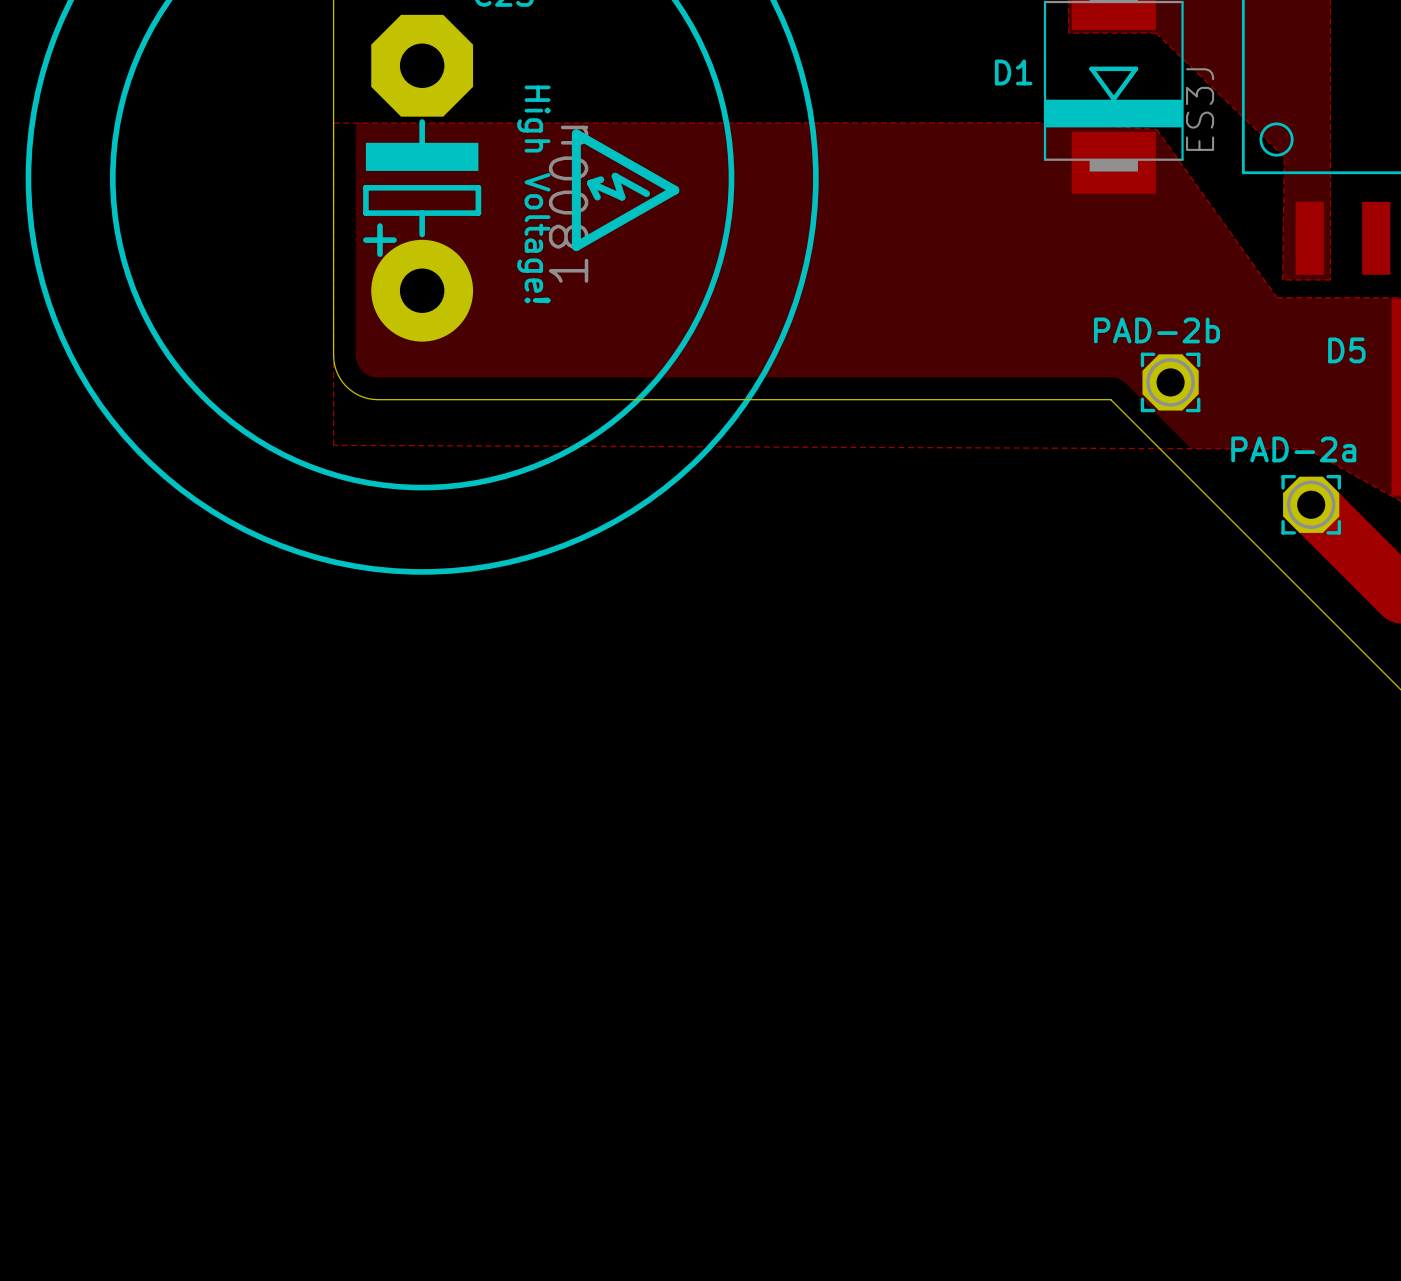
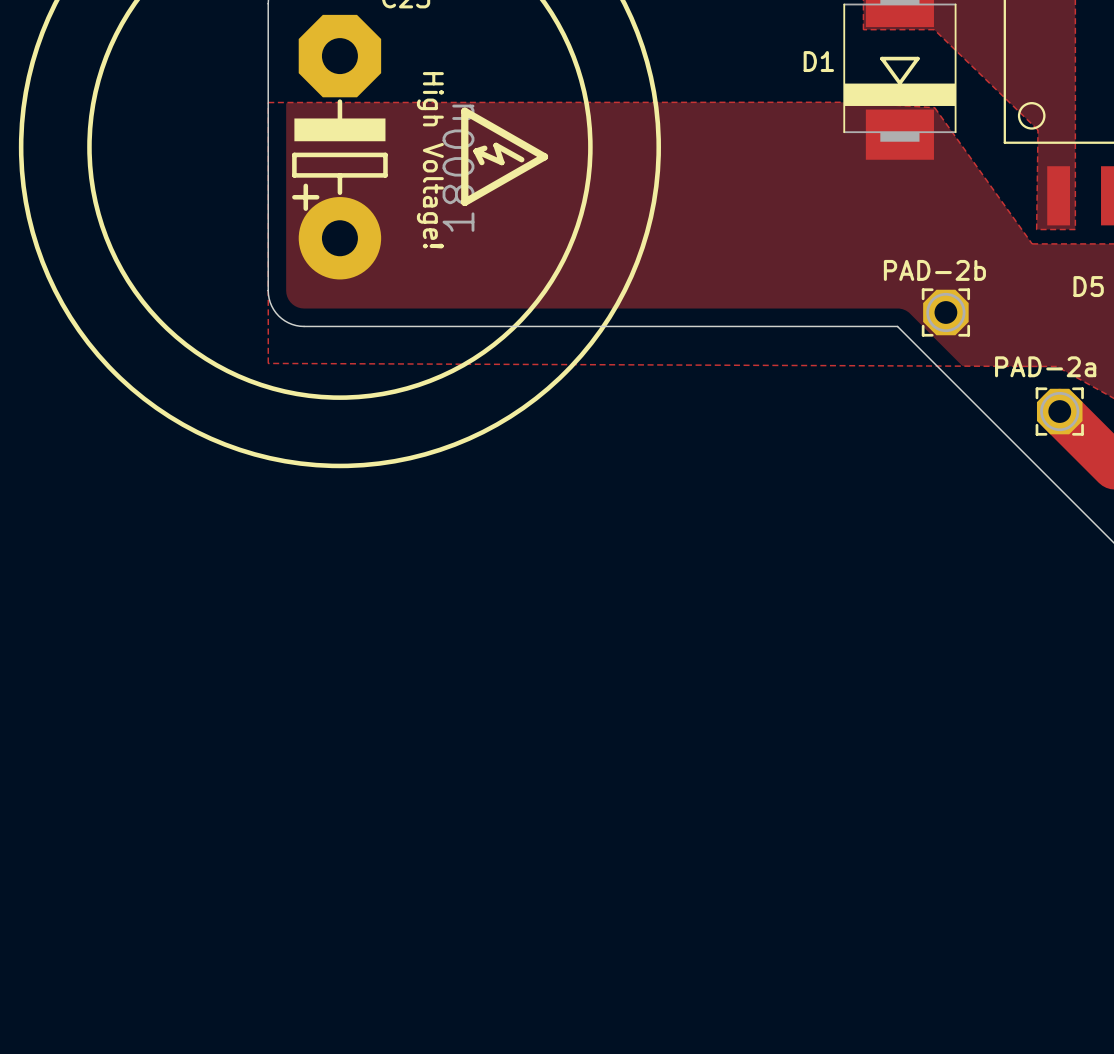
D1 value: ES3J (1200, 109) -> none

